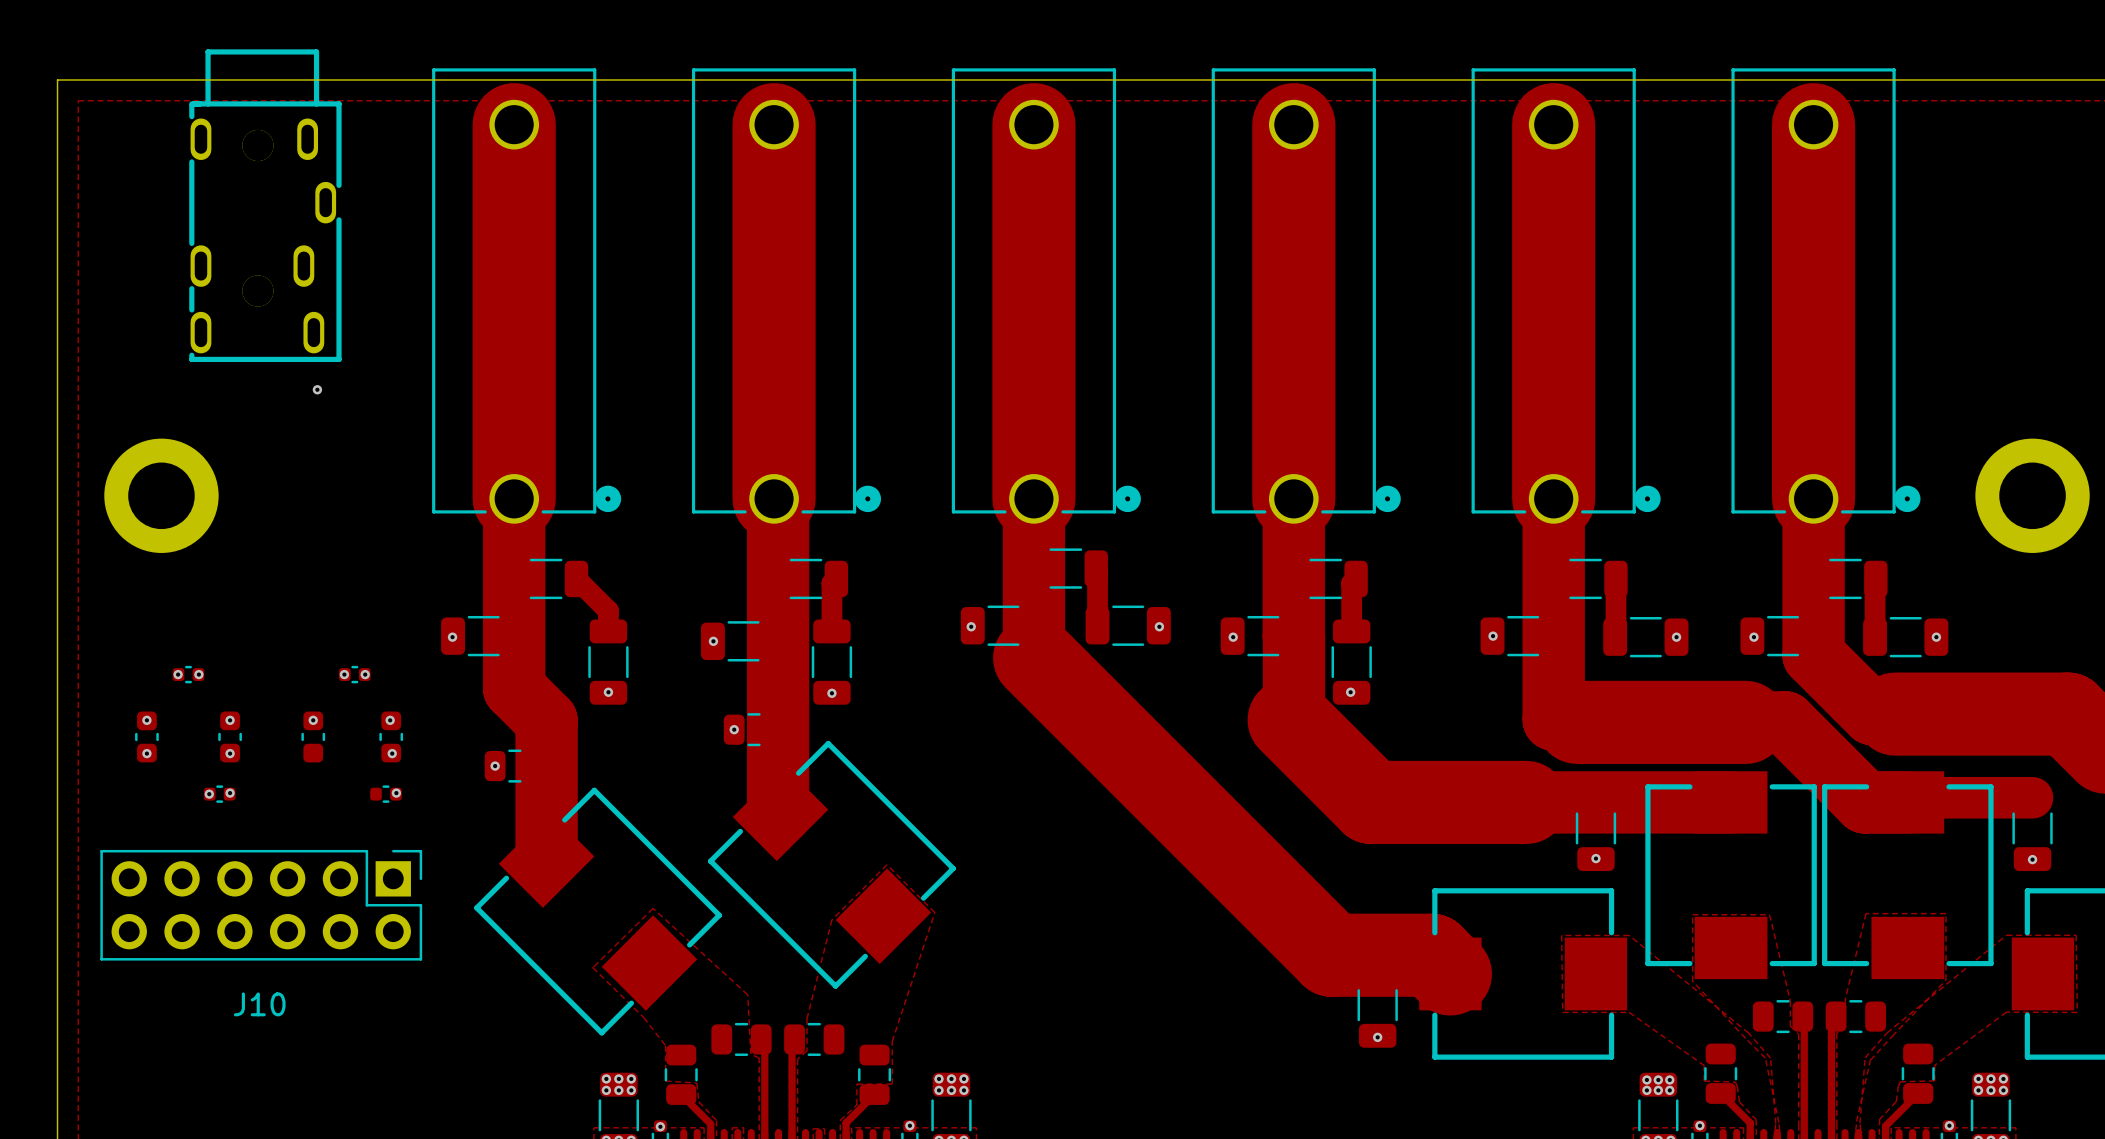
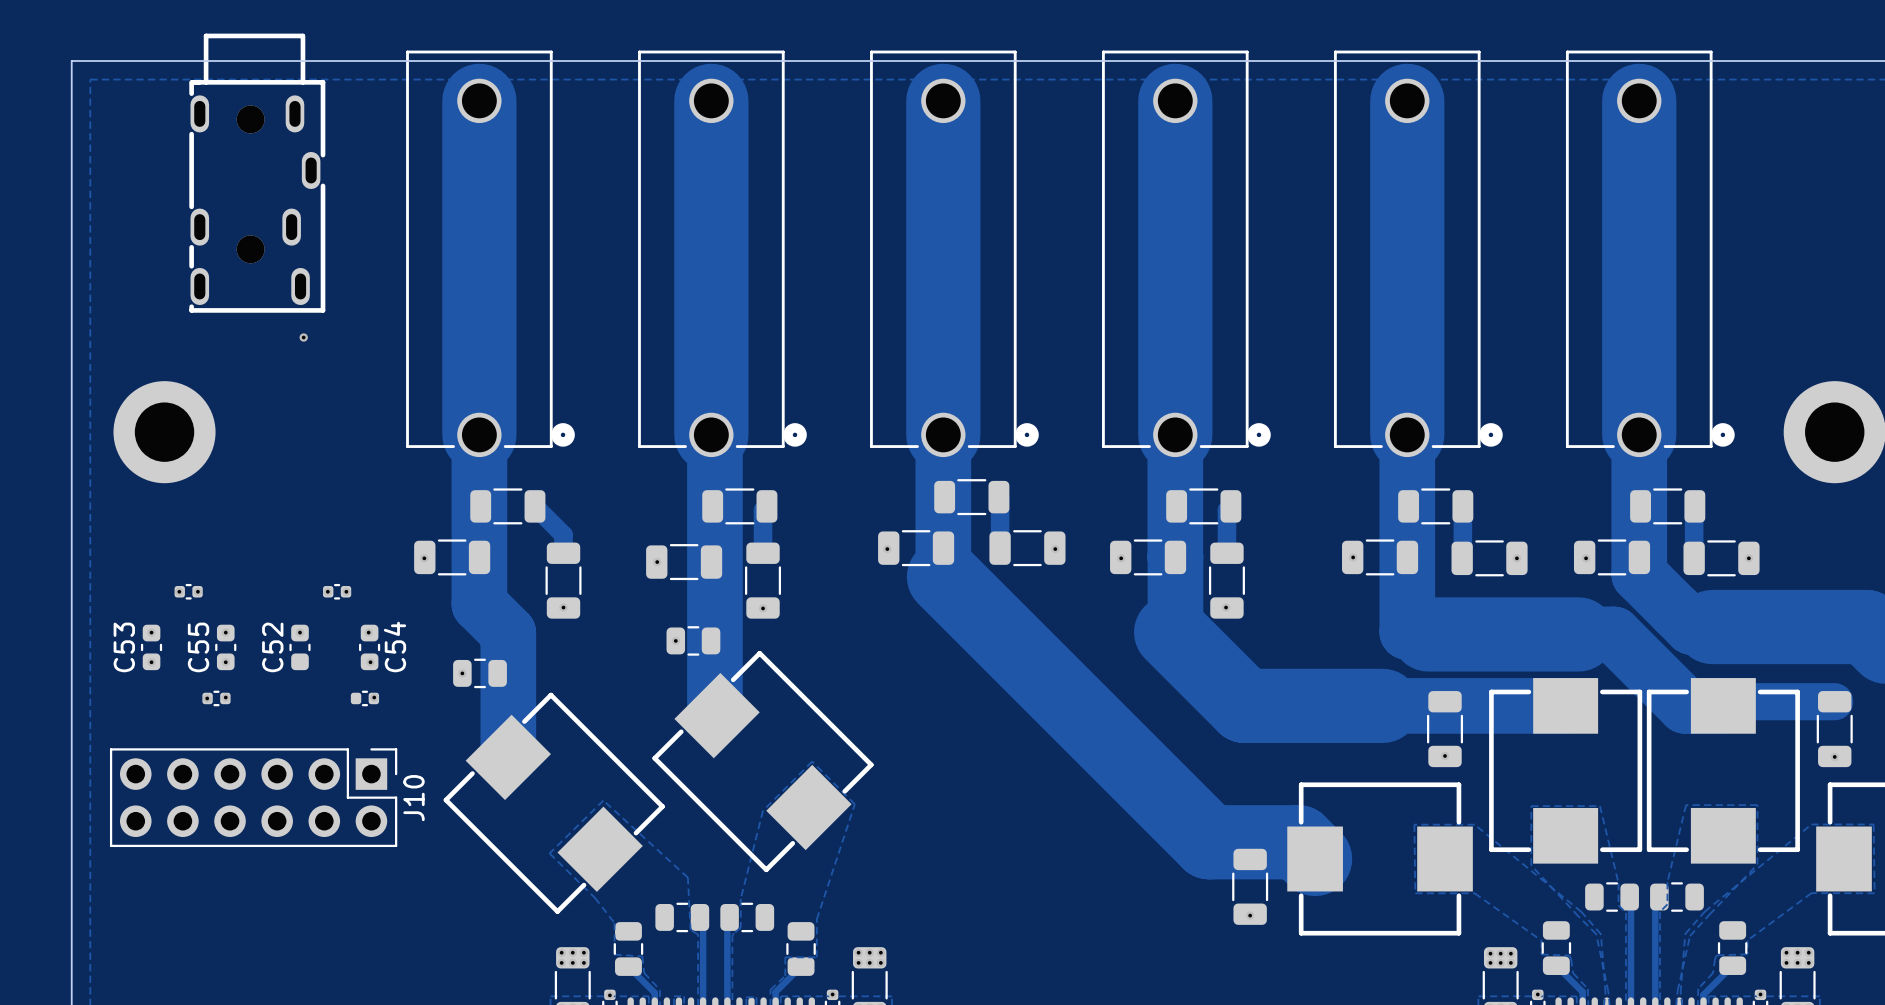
C53 name: none -> C53 (124, 647)
C55 name: none -> C55 (198, 647)
C52 name: none -> C52 (272, 647)
C54 name: none -> C54 (394, 646)
J10 name rotation: 0° (259, 1004) -> 90° counterclockwise (413, 798)
J10 name position: J10 (259, 1004) -> J10 (413, 798)

